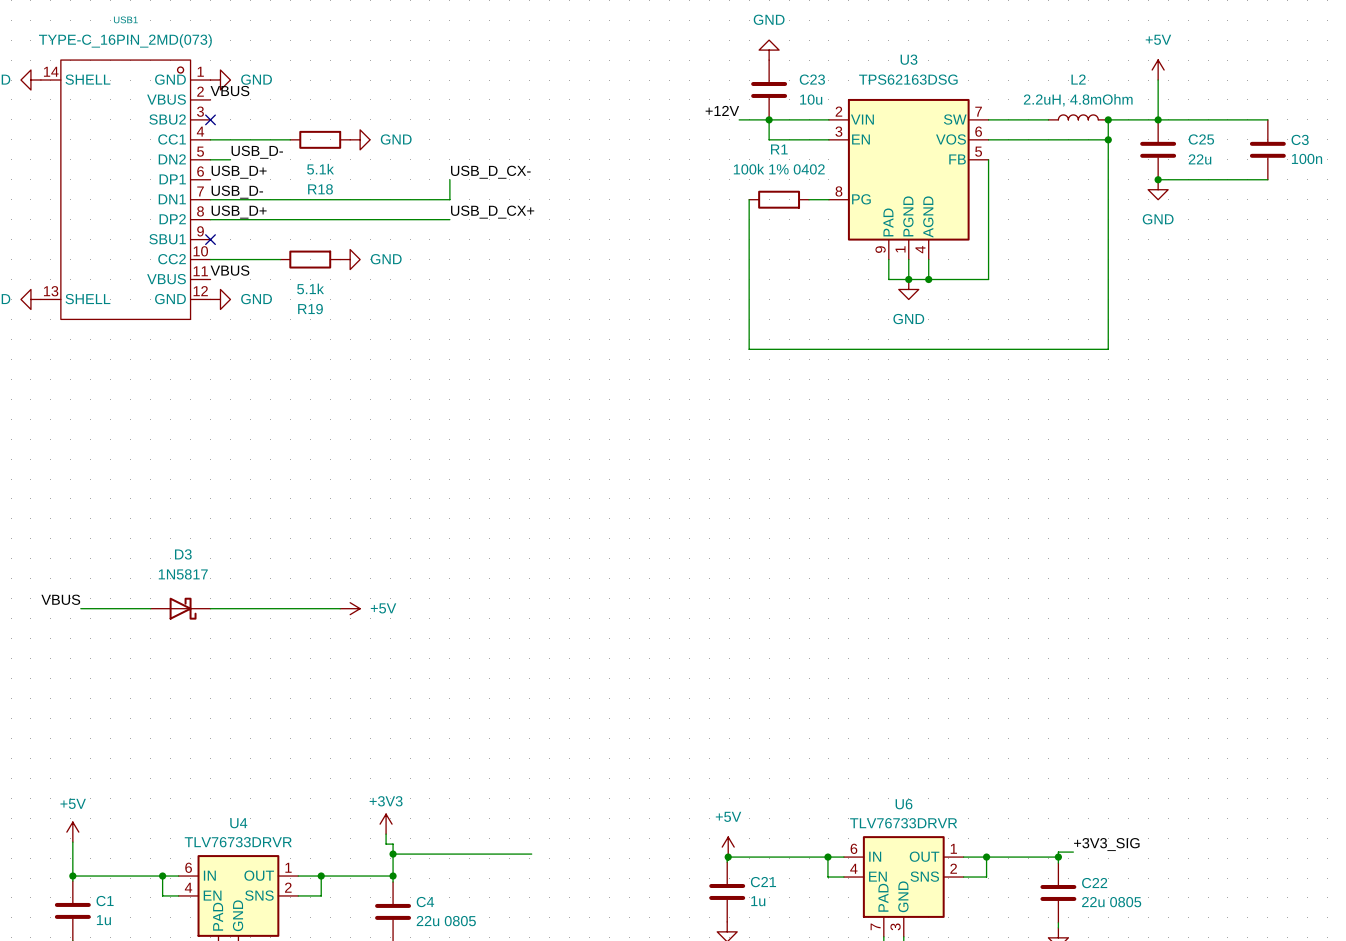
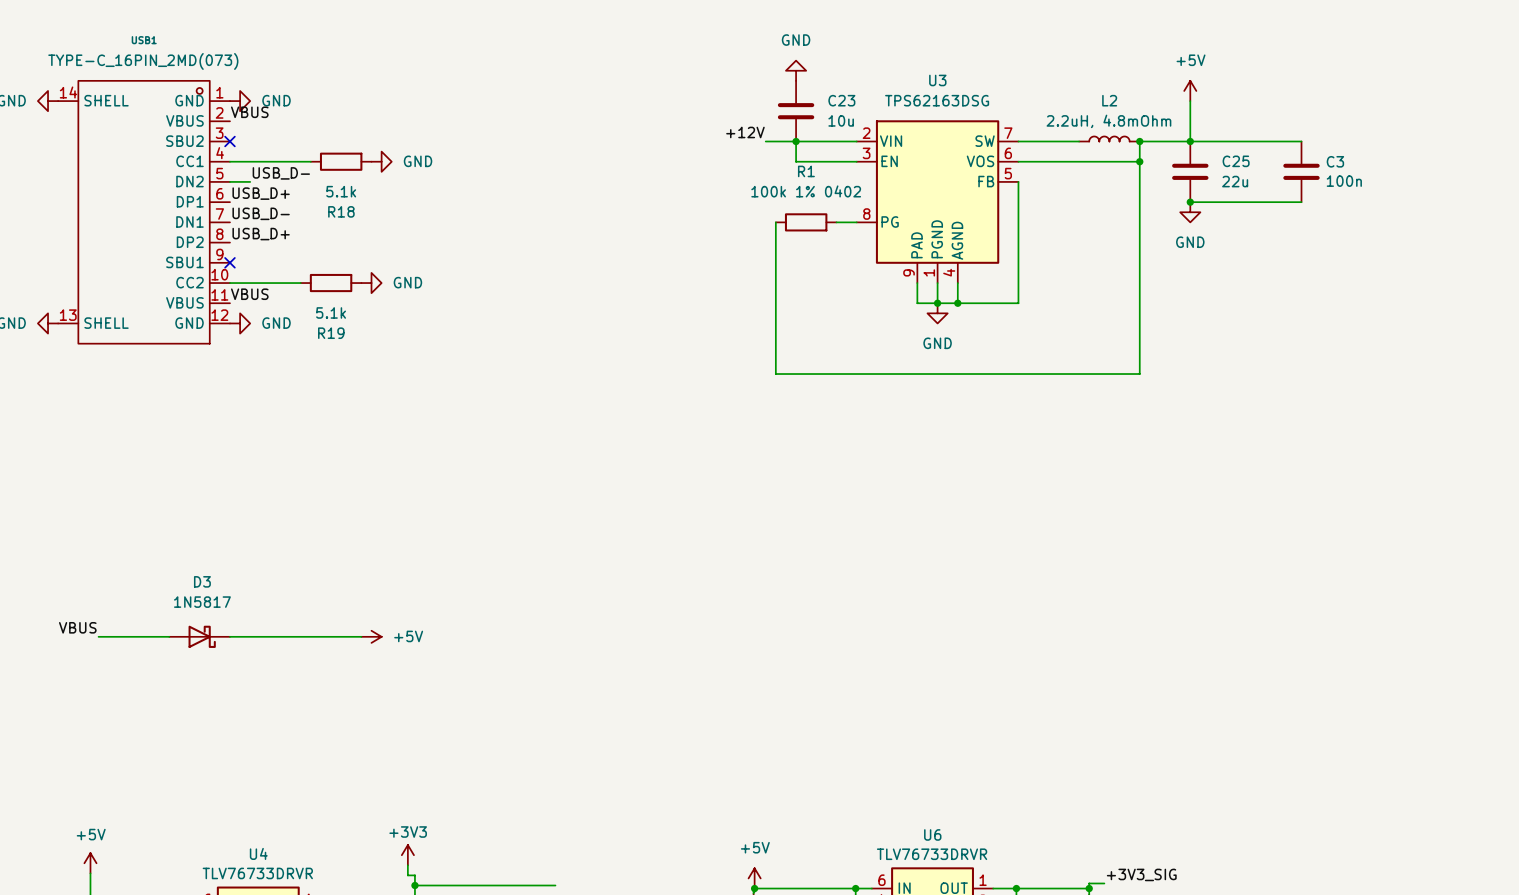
label: USB_D_CX- (490, 172) -> none
wire: (449, 179) (449, 199) (210, 199) -> none
label: USB_D_CX+ (492, 212) -> none
wire: (210, 219) (449, 219) -> none

